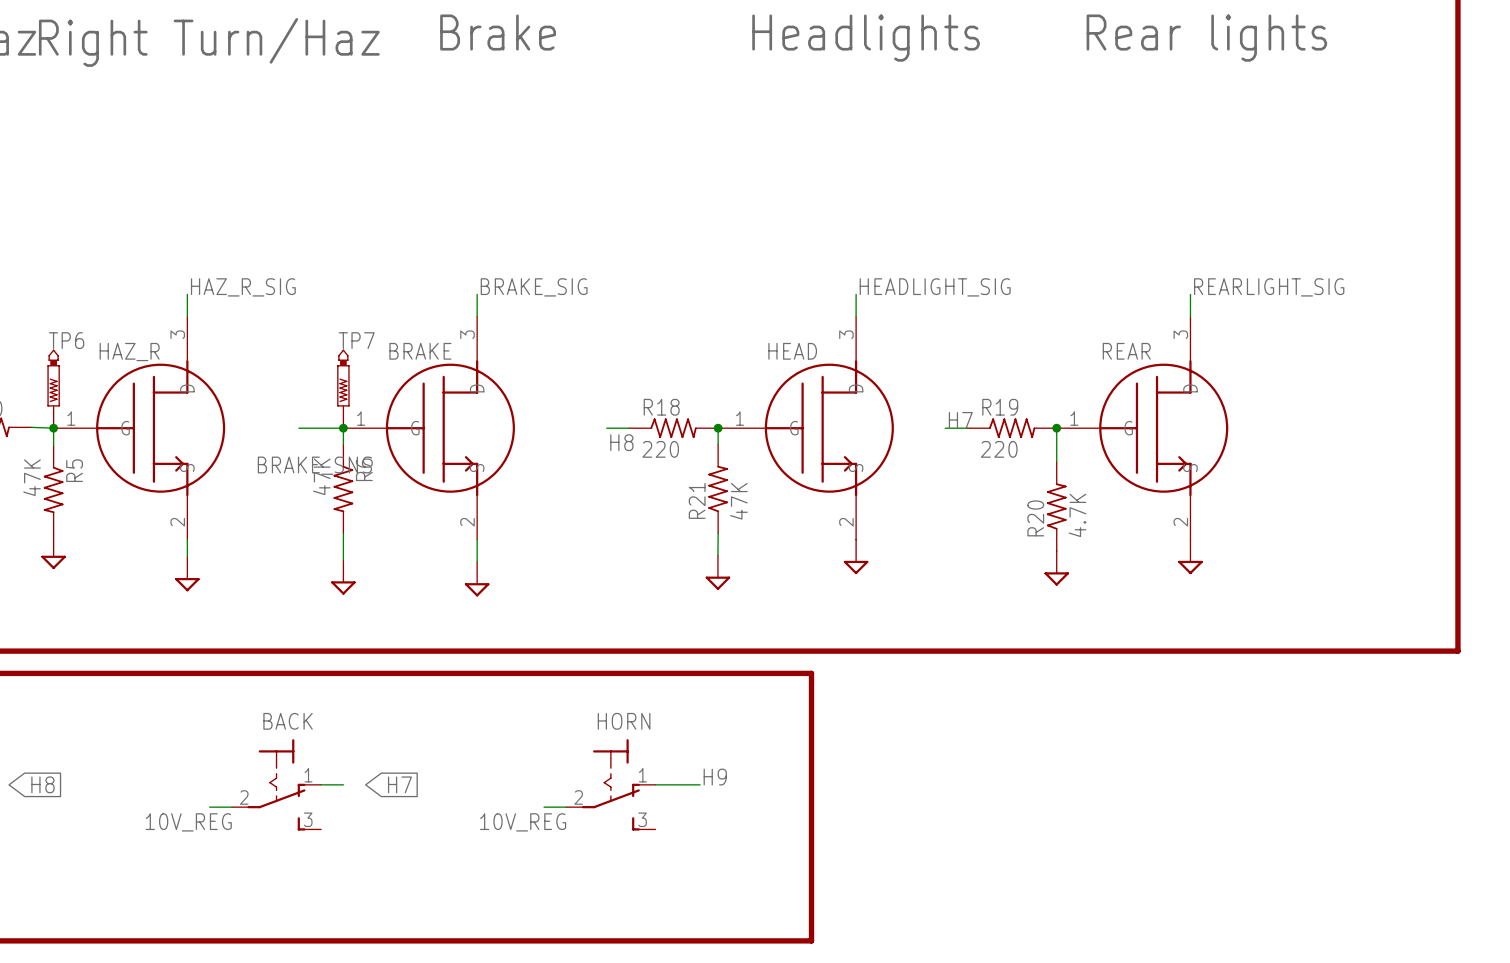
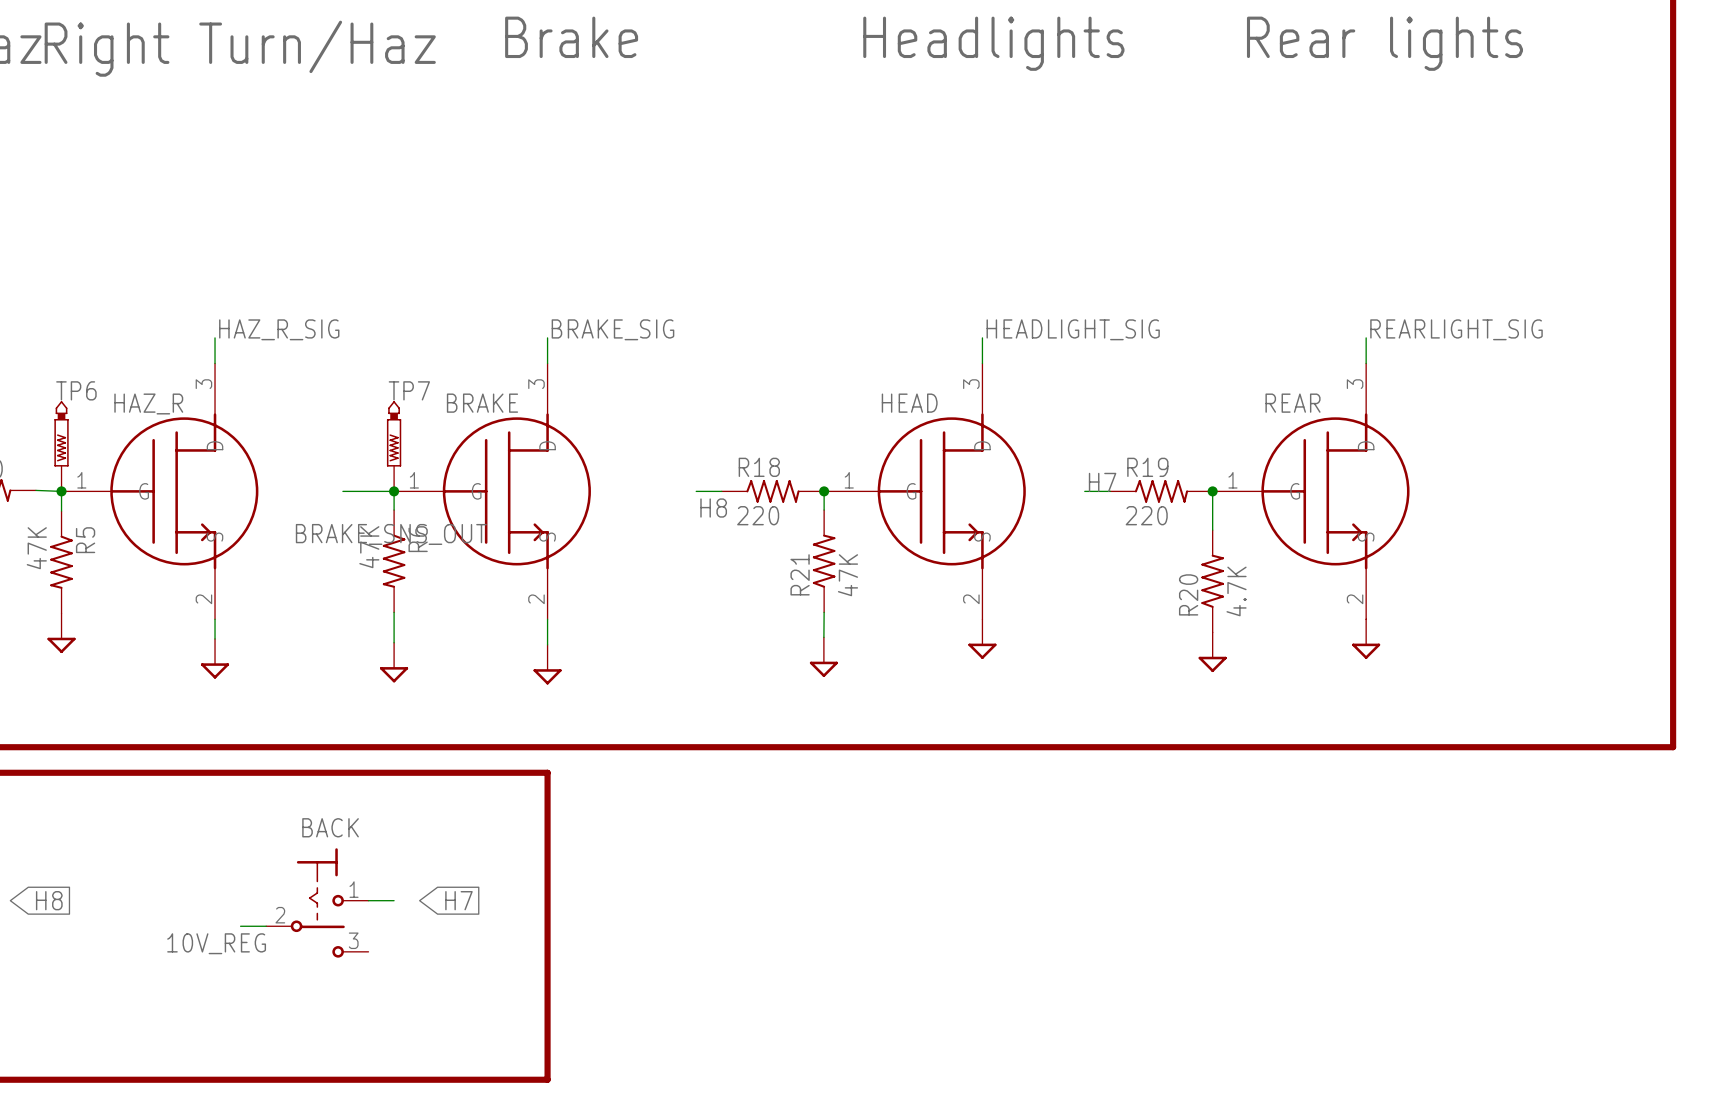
label: BRAKE_SNS (314, 465) -> BRAKE_SNS_OUT (391, 534)
line: (477, 673) (811, 673) (811, 940) (477, 940) -> (547, 772) (547, 1079)
BACK symbol: [231, 739, 322, 831] -> [266, 848, 369, 958]
label: H9 (715, 777) -> none
HORN: (610, 784) -> none
wire: (655, 784) (700, 784) -> none
wire: (544, 807) (566, 807) -> none
label: 10V_REG (523, 822) -> none

